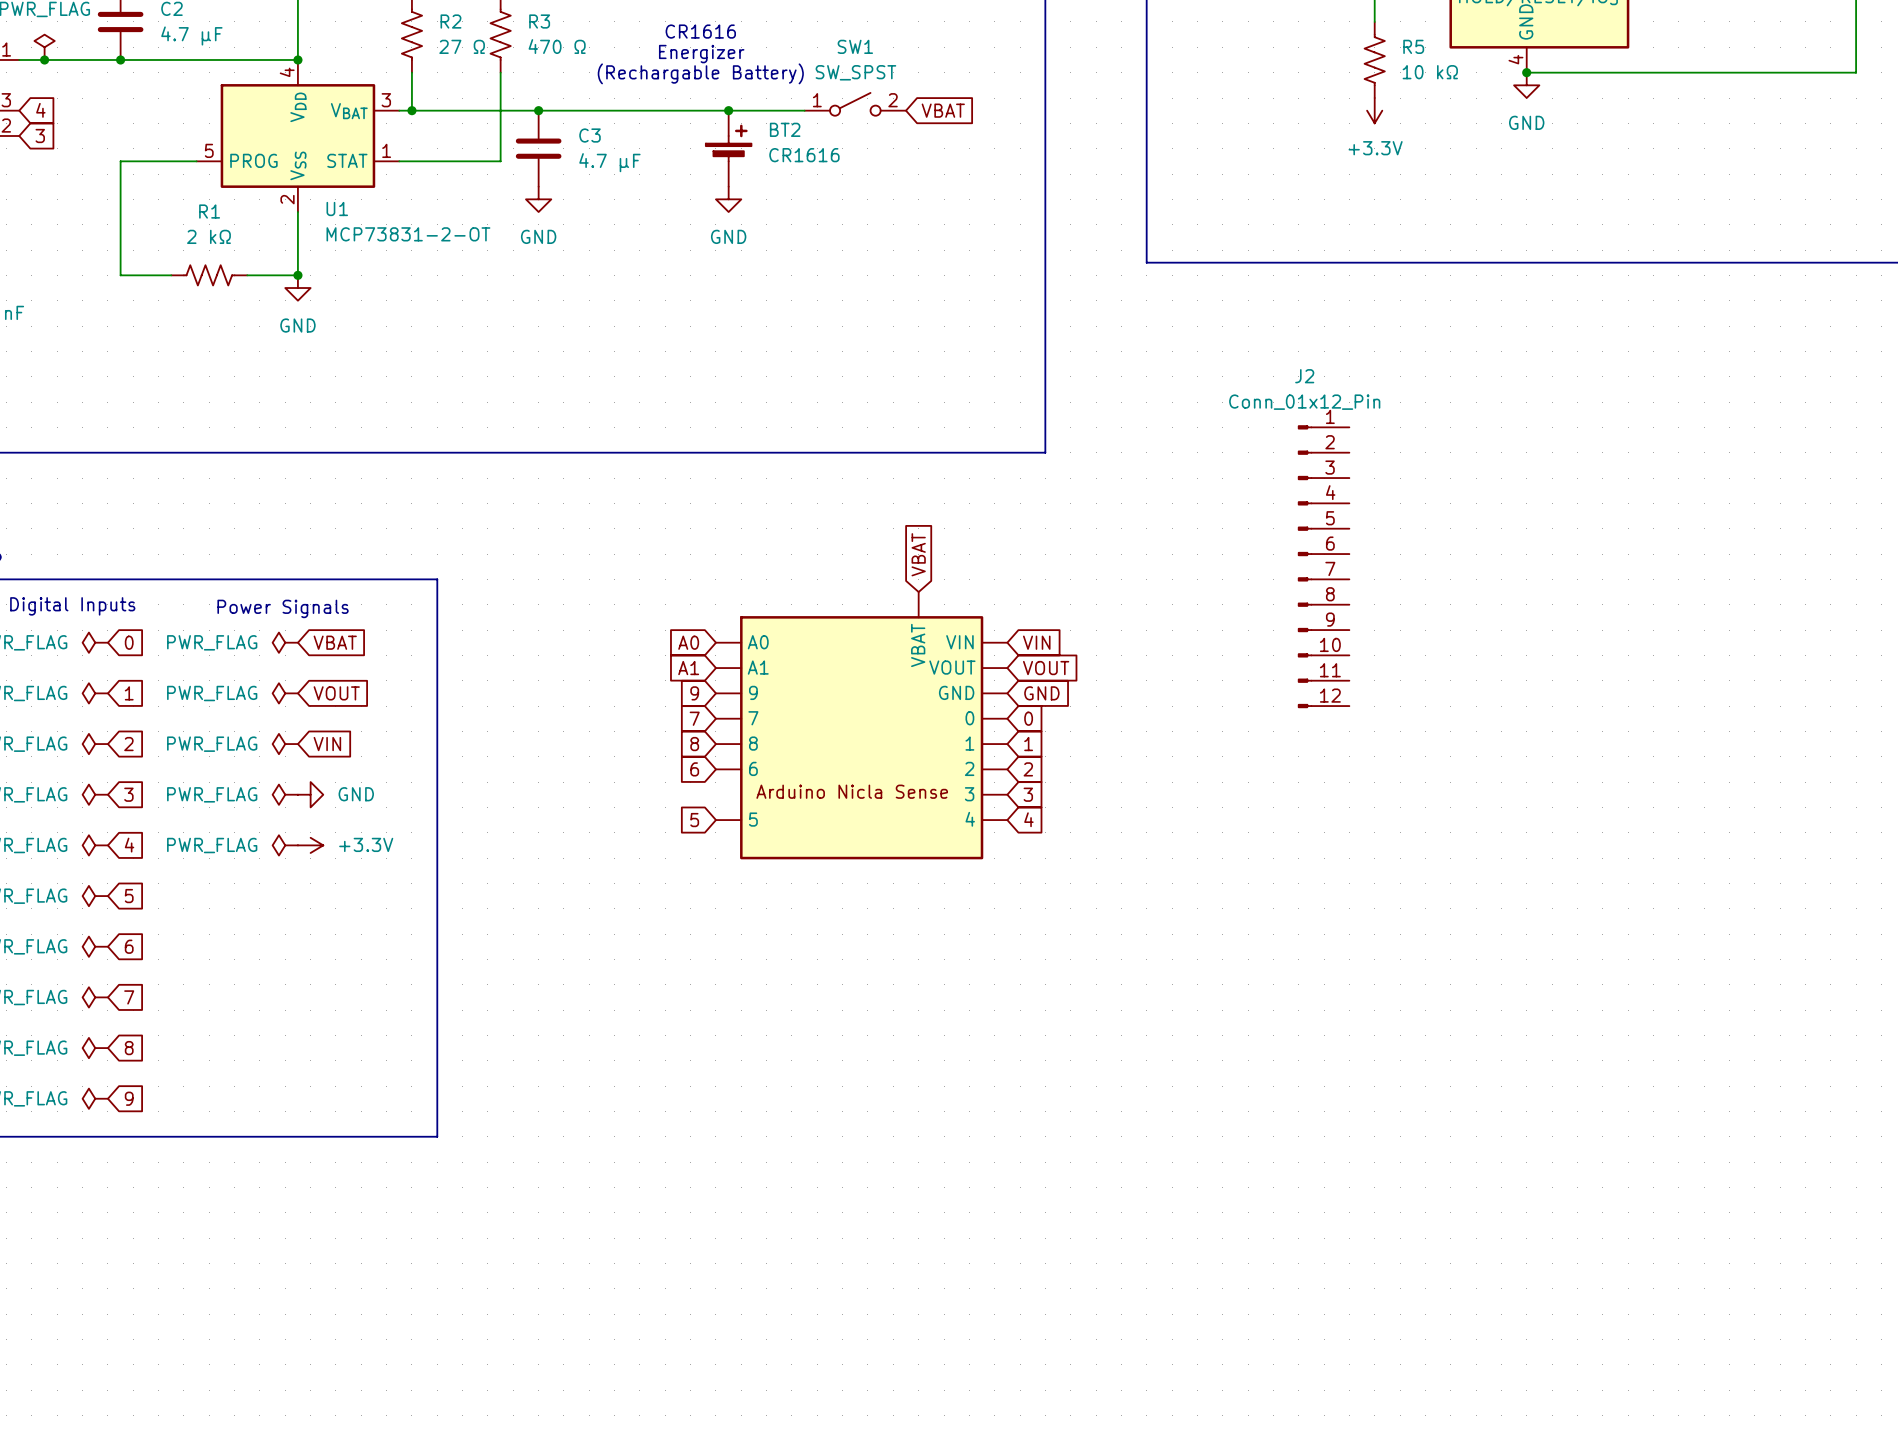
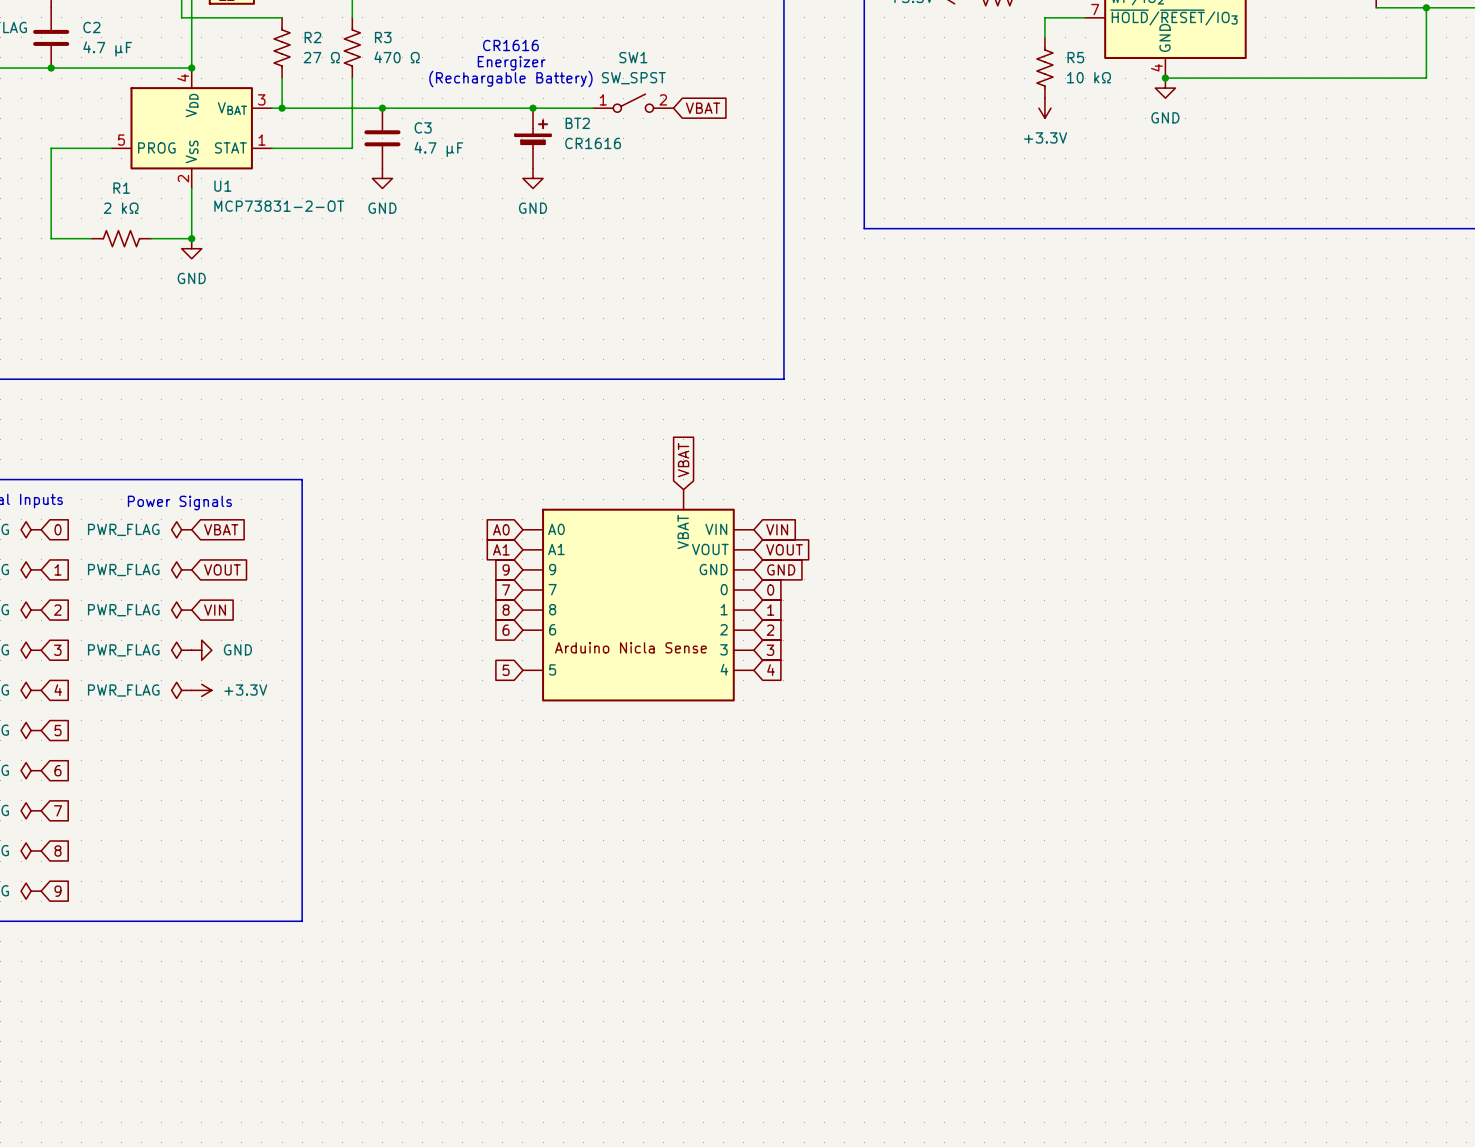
J2: Conn_01x12_Pin (1323, 566) -> none

